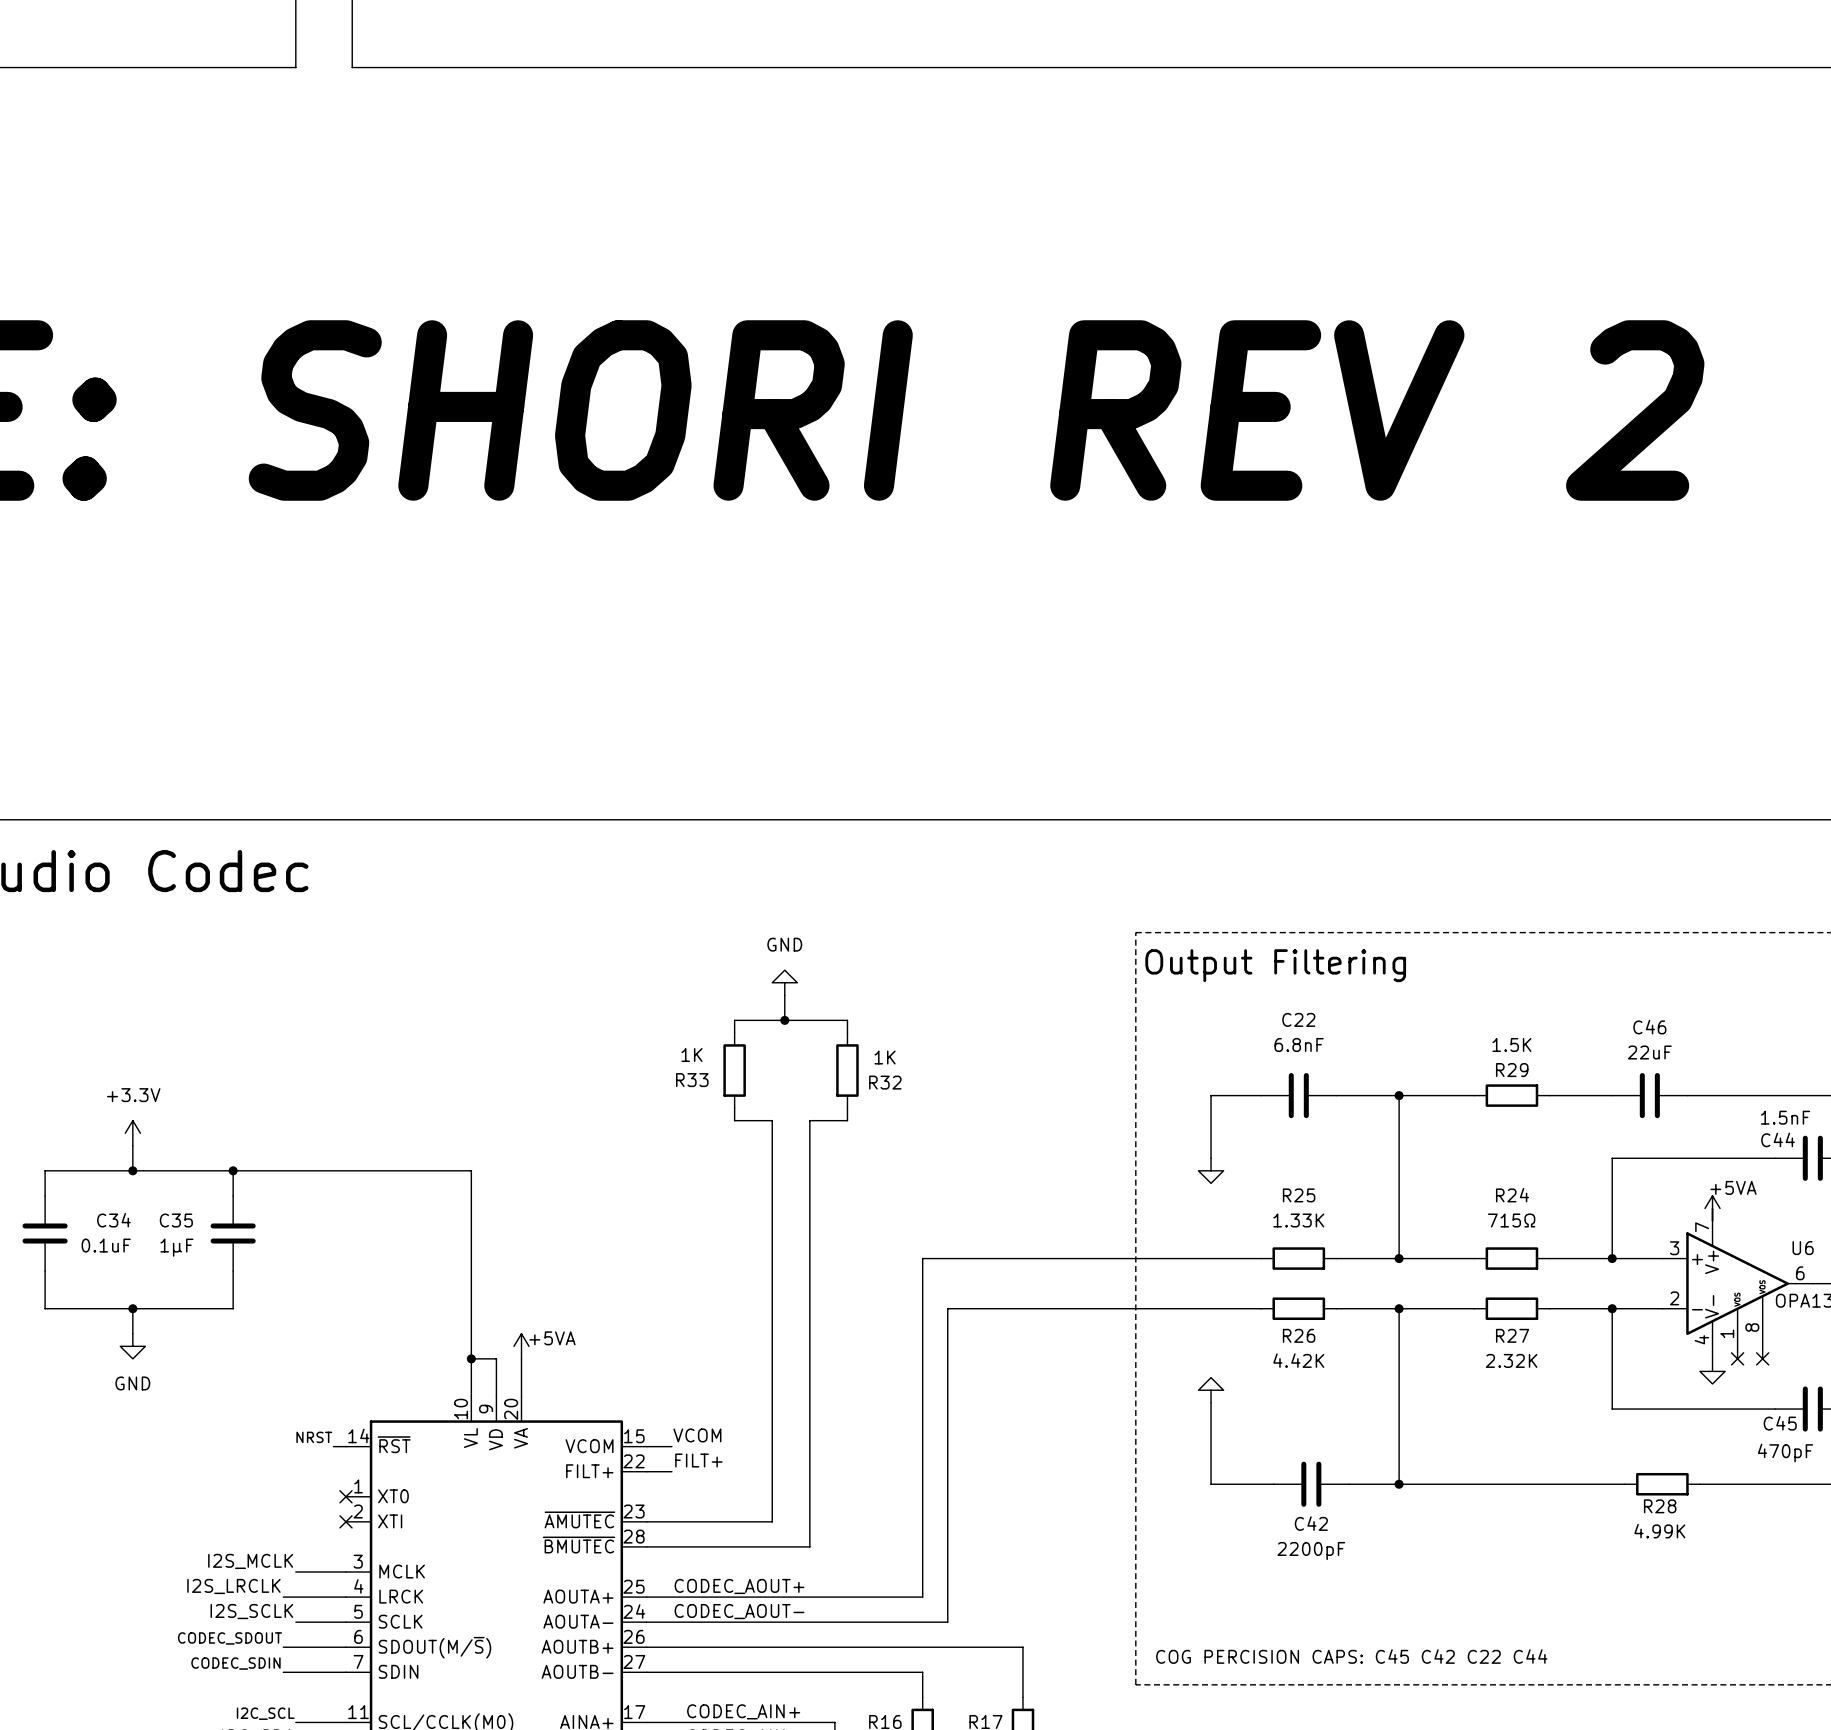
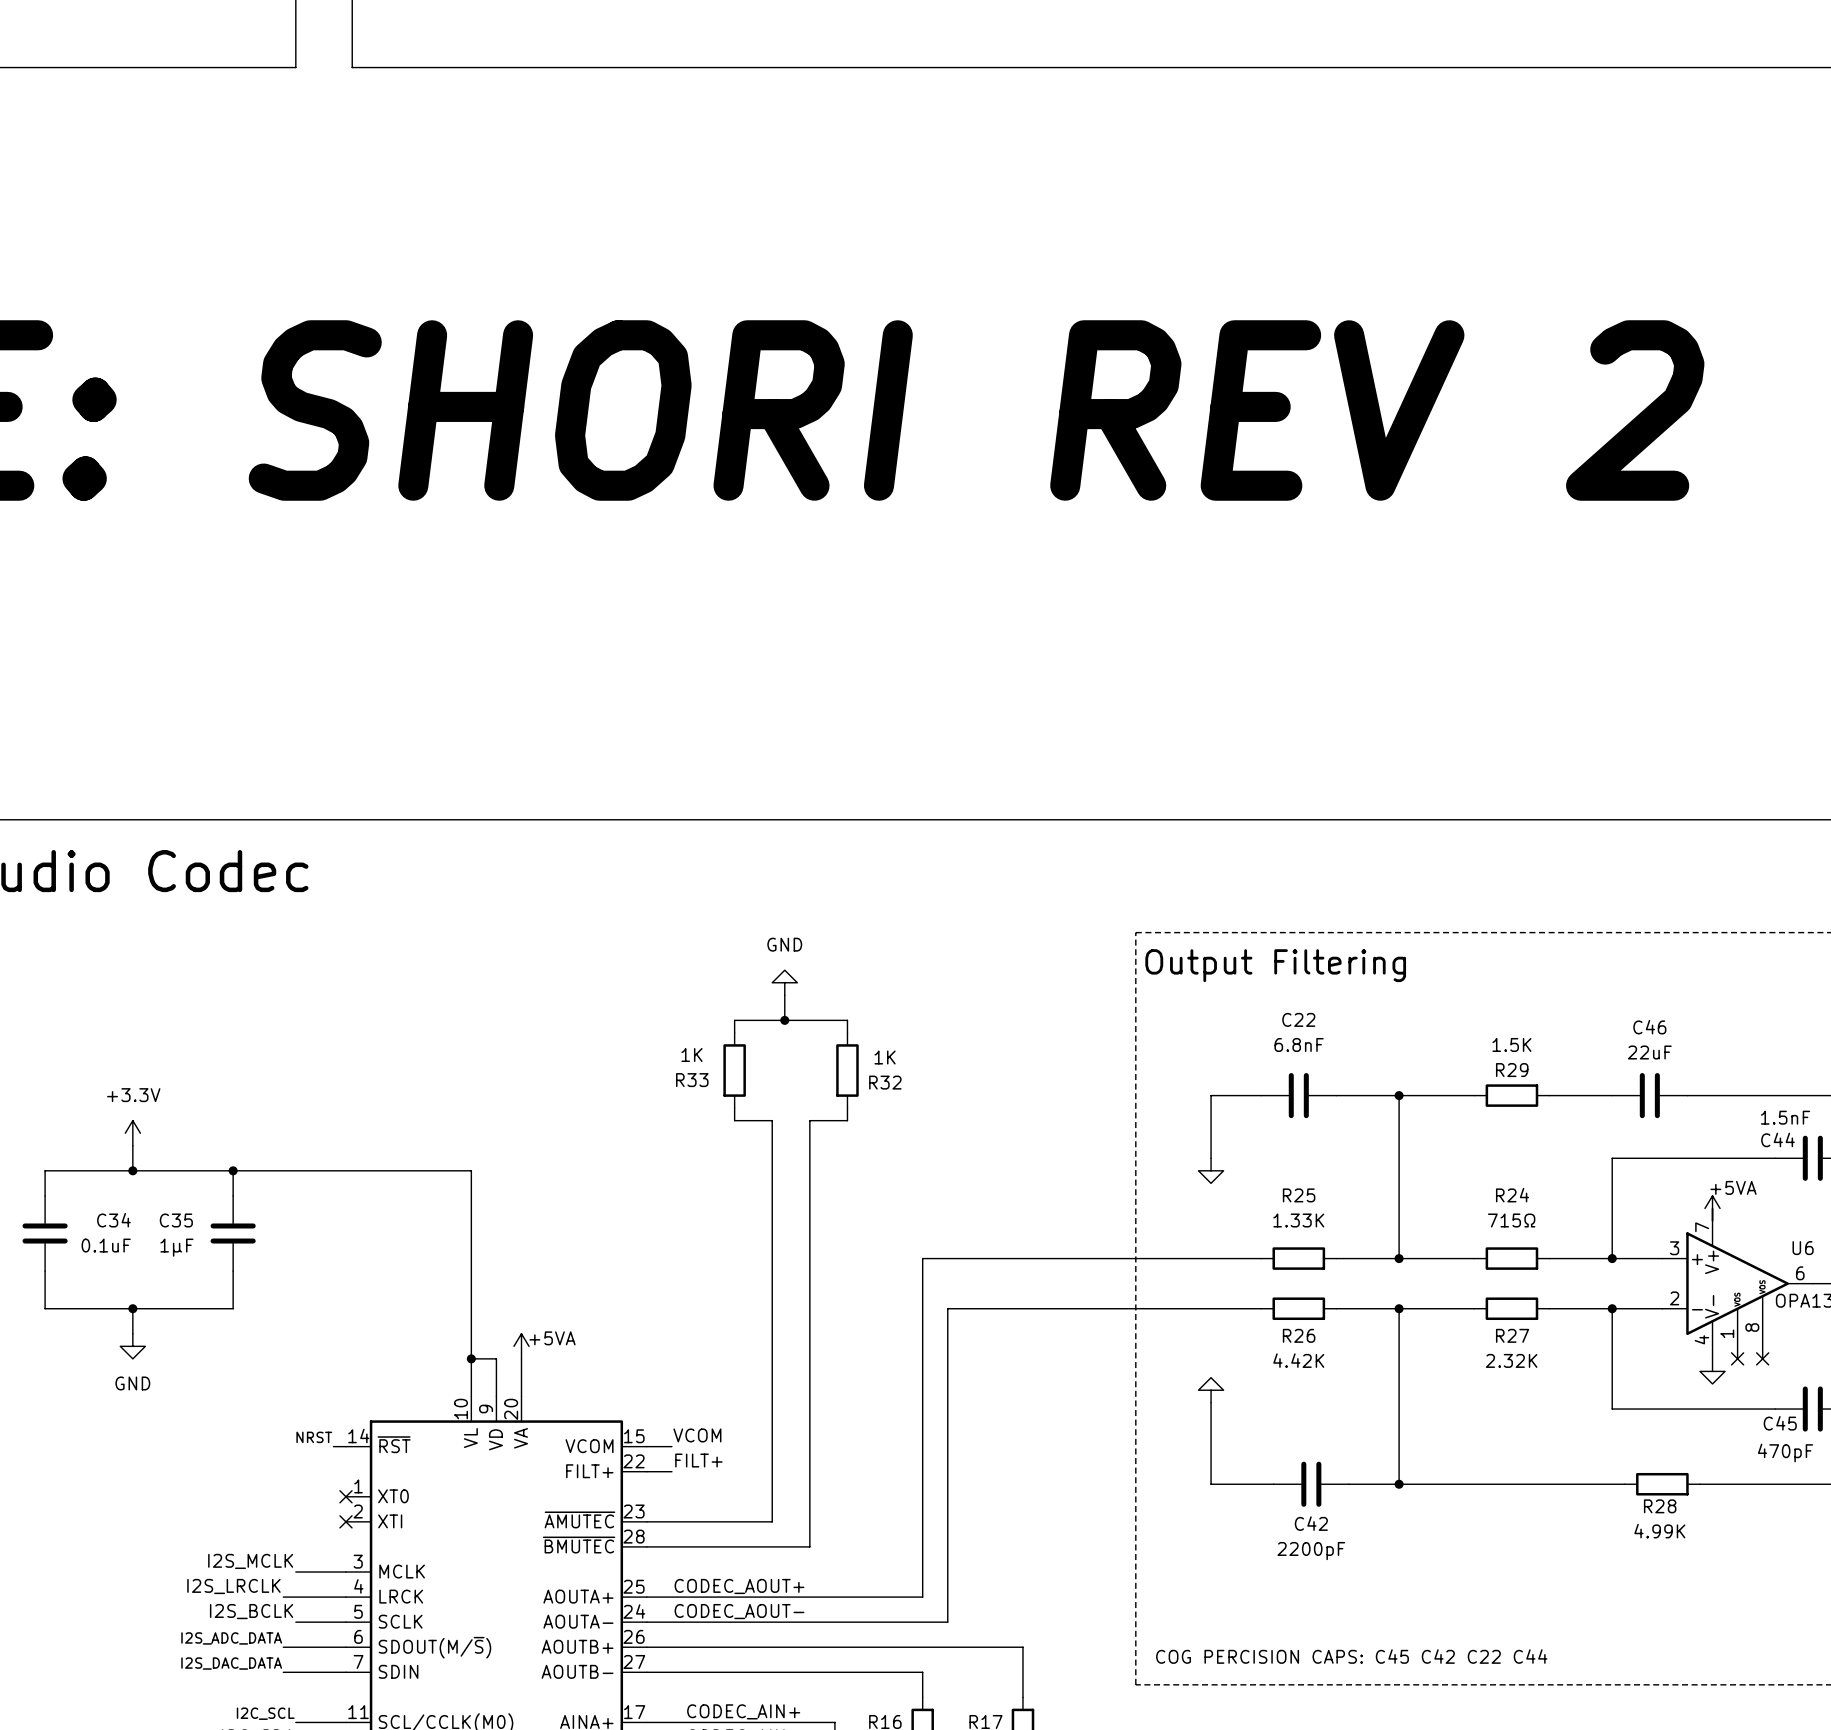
label: I2S_SCLK (251, 1611) -> I2S_BCLK (251, 1611)
label: CODEC_SDOUT (230, 1638) -> I2S_ADC_DATA (231, 1638)
label: CODEC_SDIN (235, 1663) -> I2S_DAC_DATA (231, 1663)

